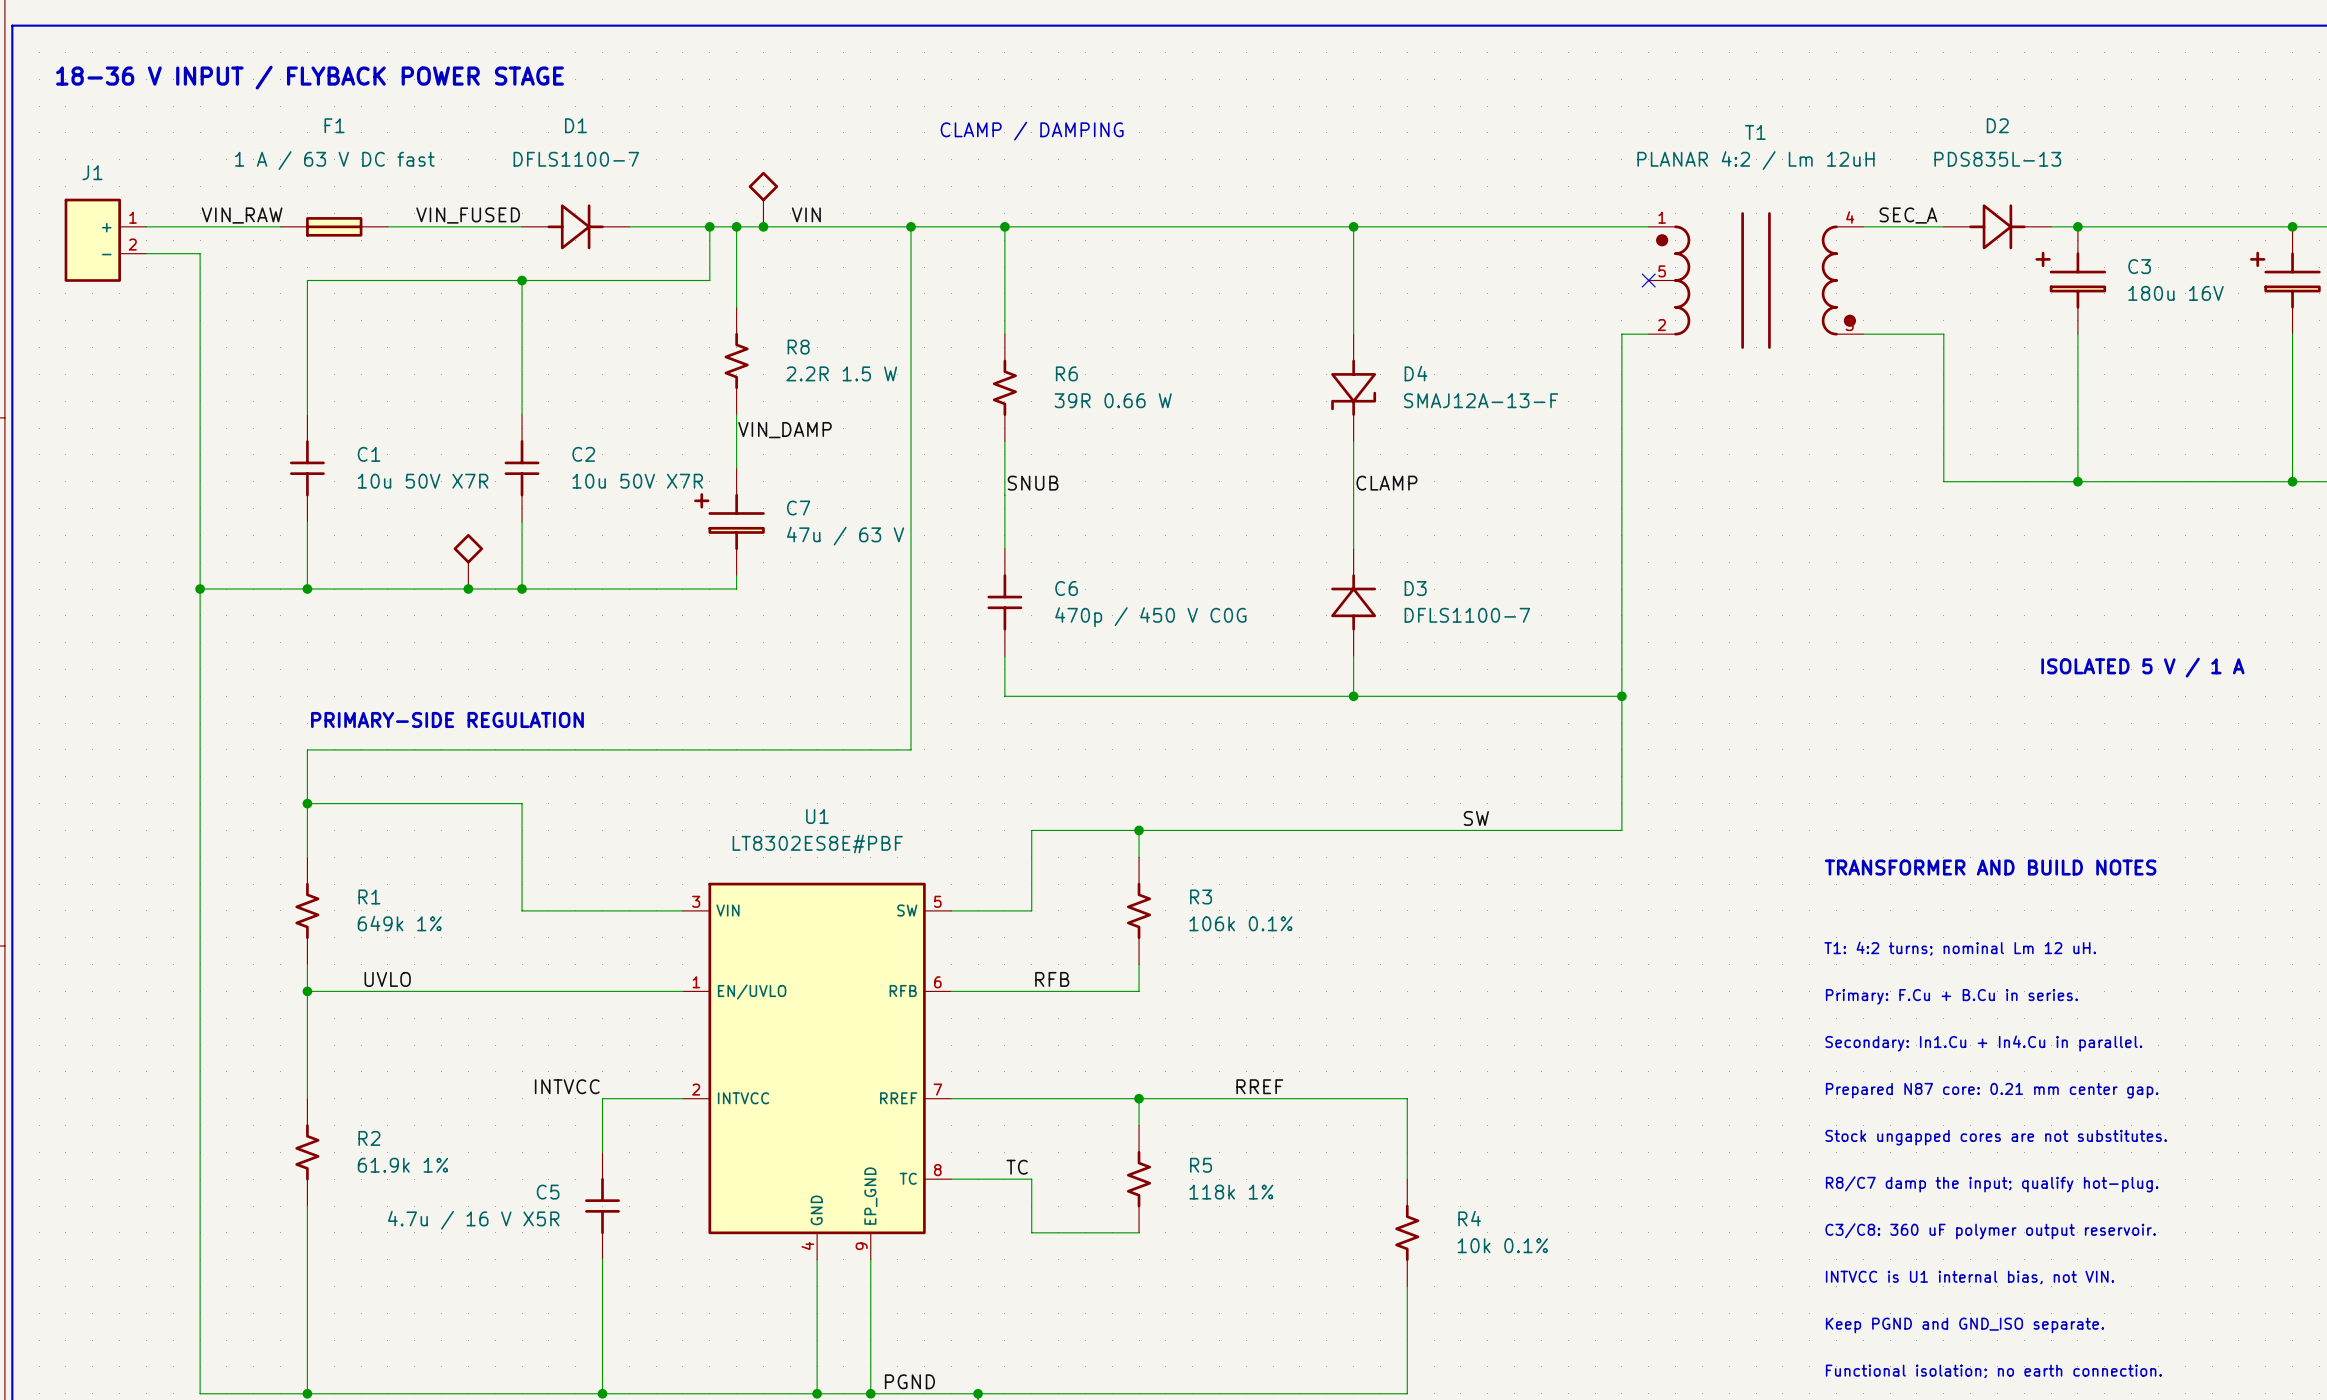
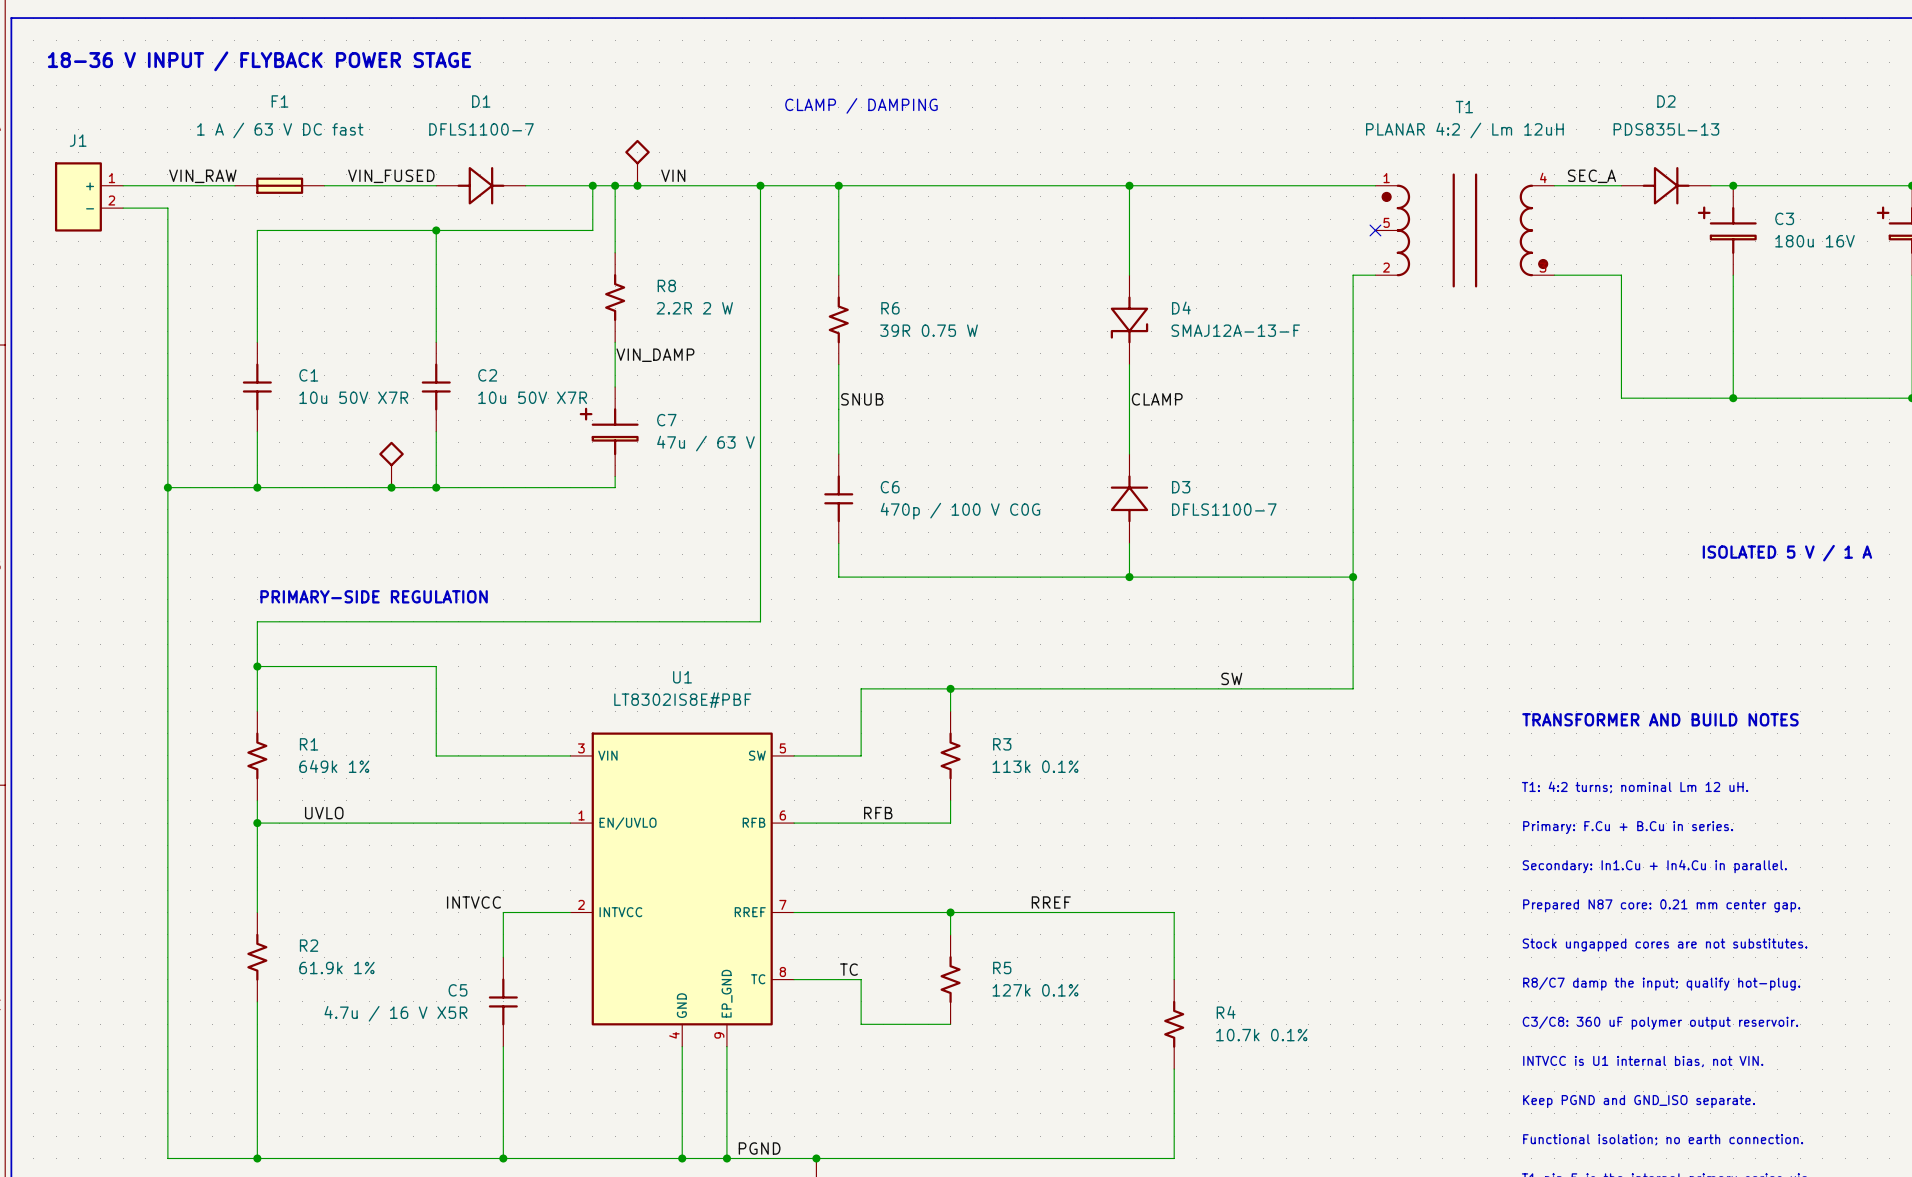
R8 value: 2.2R 1.5 W (841, 373) -> 2.2R 2 W (694, 308)
R6 value: 39R 0.66 W (1113, 400) -> 39R 0.75 W (929, 330)
C6 value: 470p / 450 V C0G (1150, 617) -> 470p / 100 V C0G (960, 511)
U1 value: LT8302ES8E#PBF (817, 843) -> LT8302IS8E#PBF (682, 700)
R3 value: 106k 0.1% (1240, 923) -> 113k 0.1% (1035, 766)
R5 value: 118k 1% (1231, 1192) -> 127k 0.1% (1035, 990)
R4 value: 10k 0.1% (1502, 1245) -> 10.7k 0.1% (1261, 1035)

